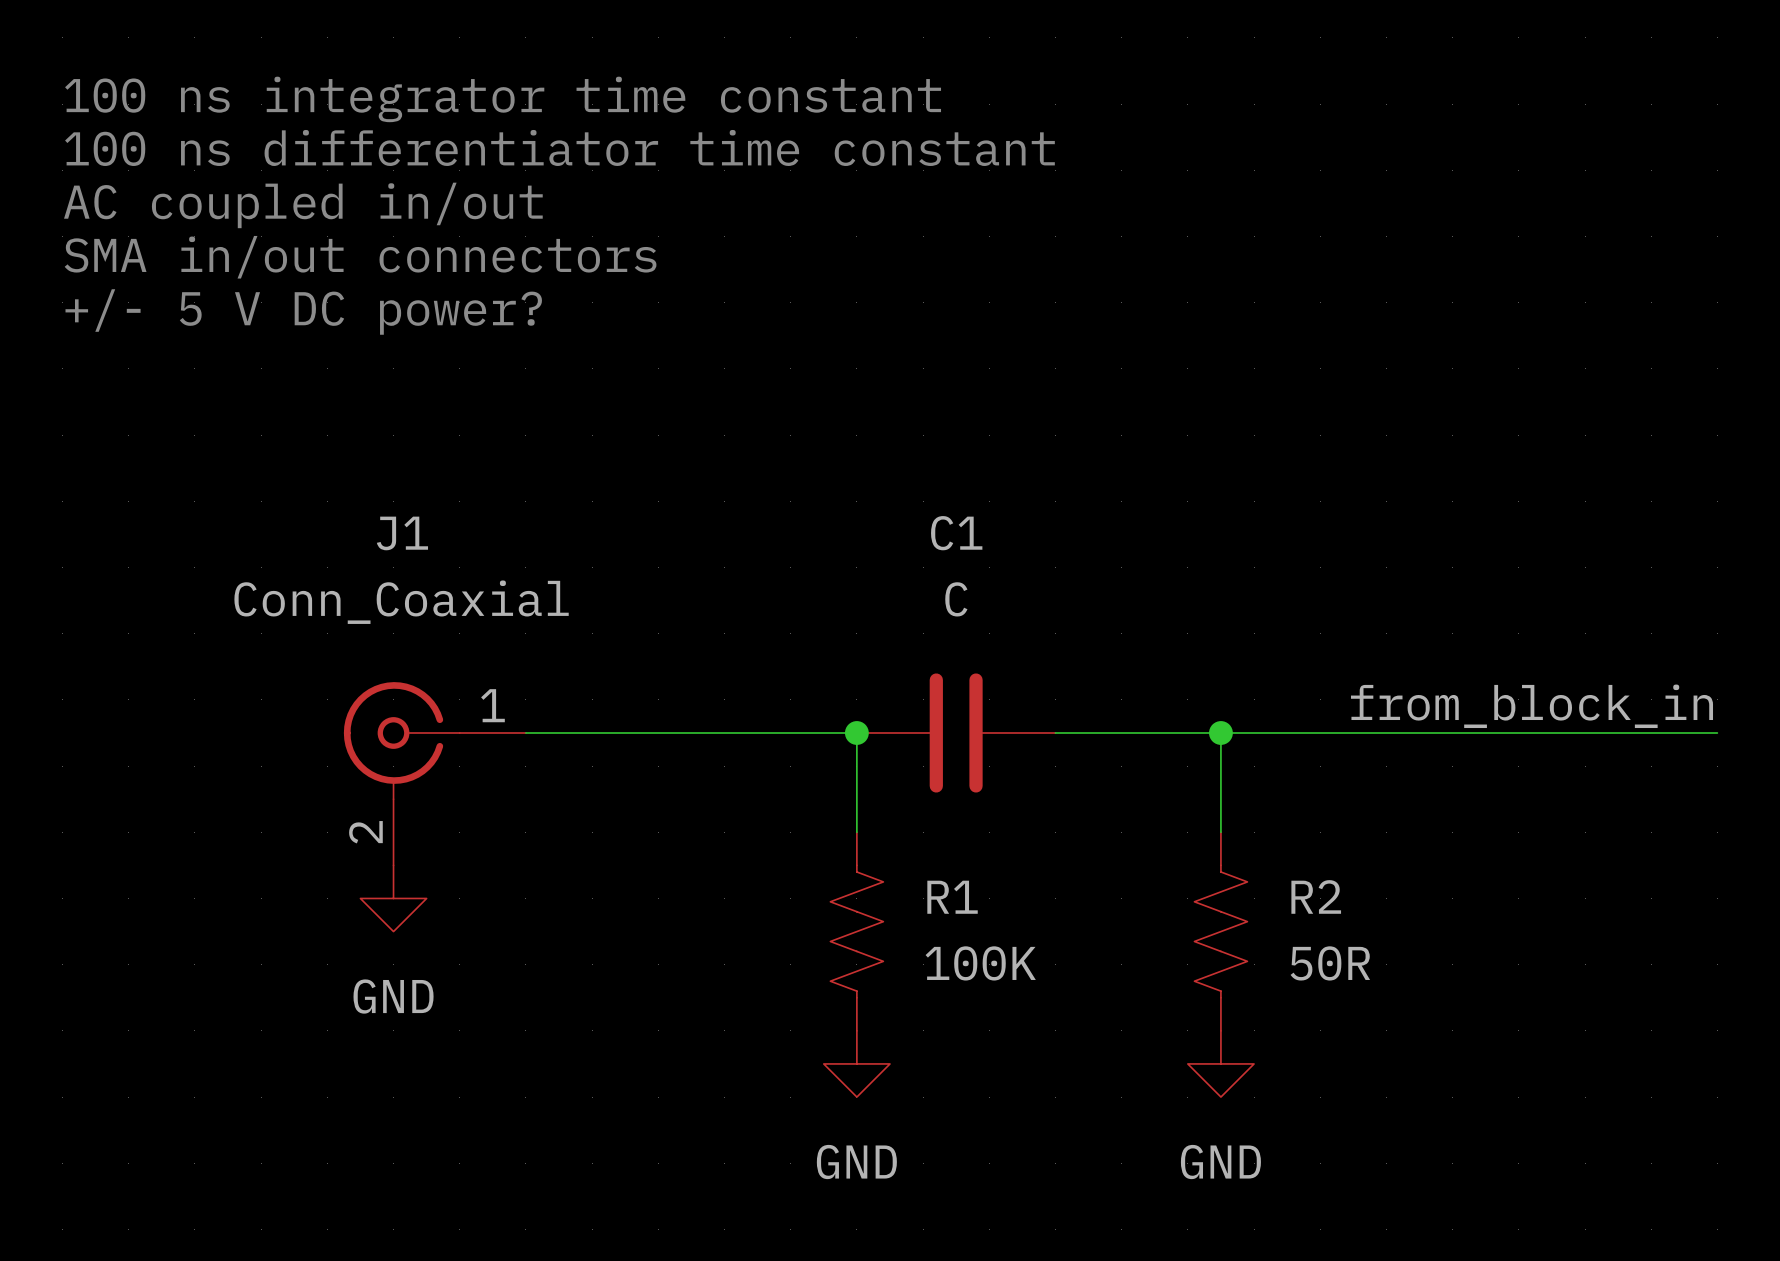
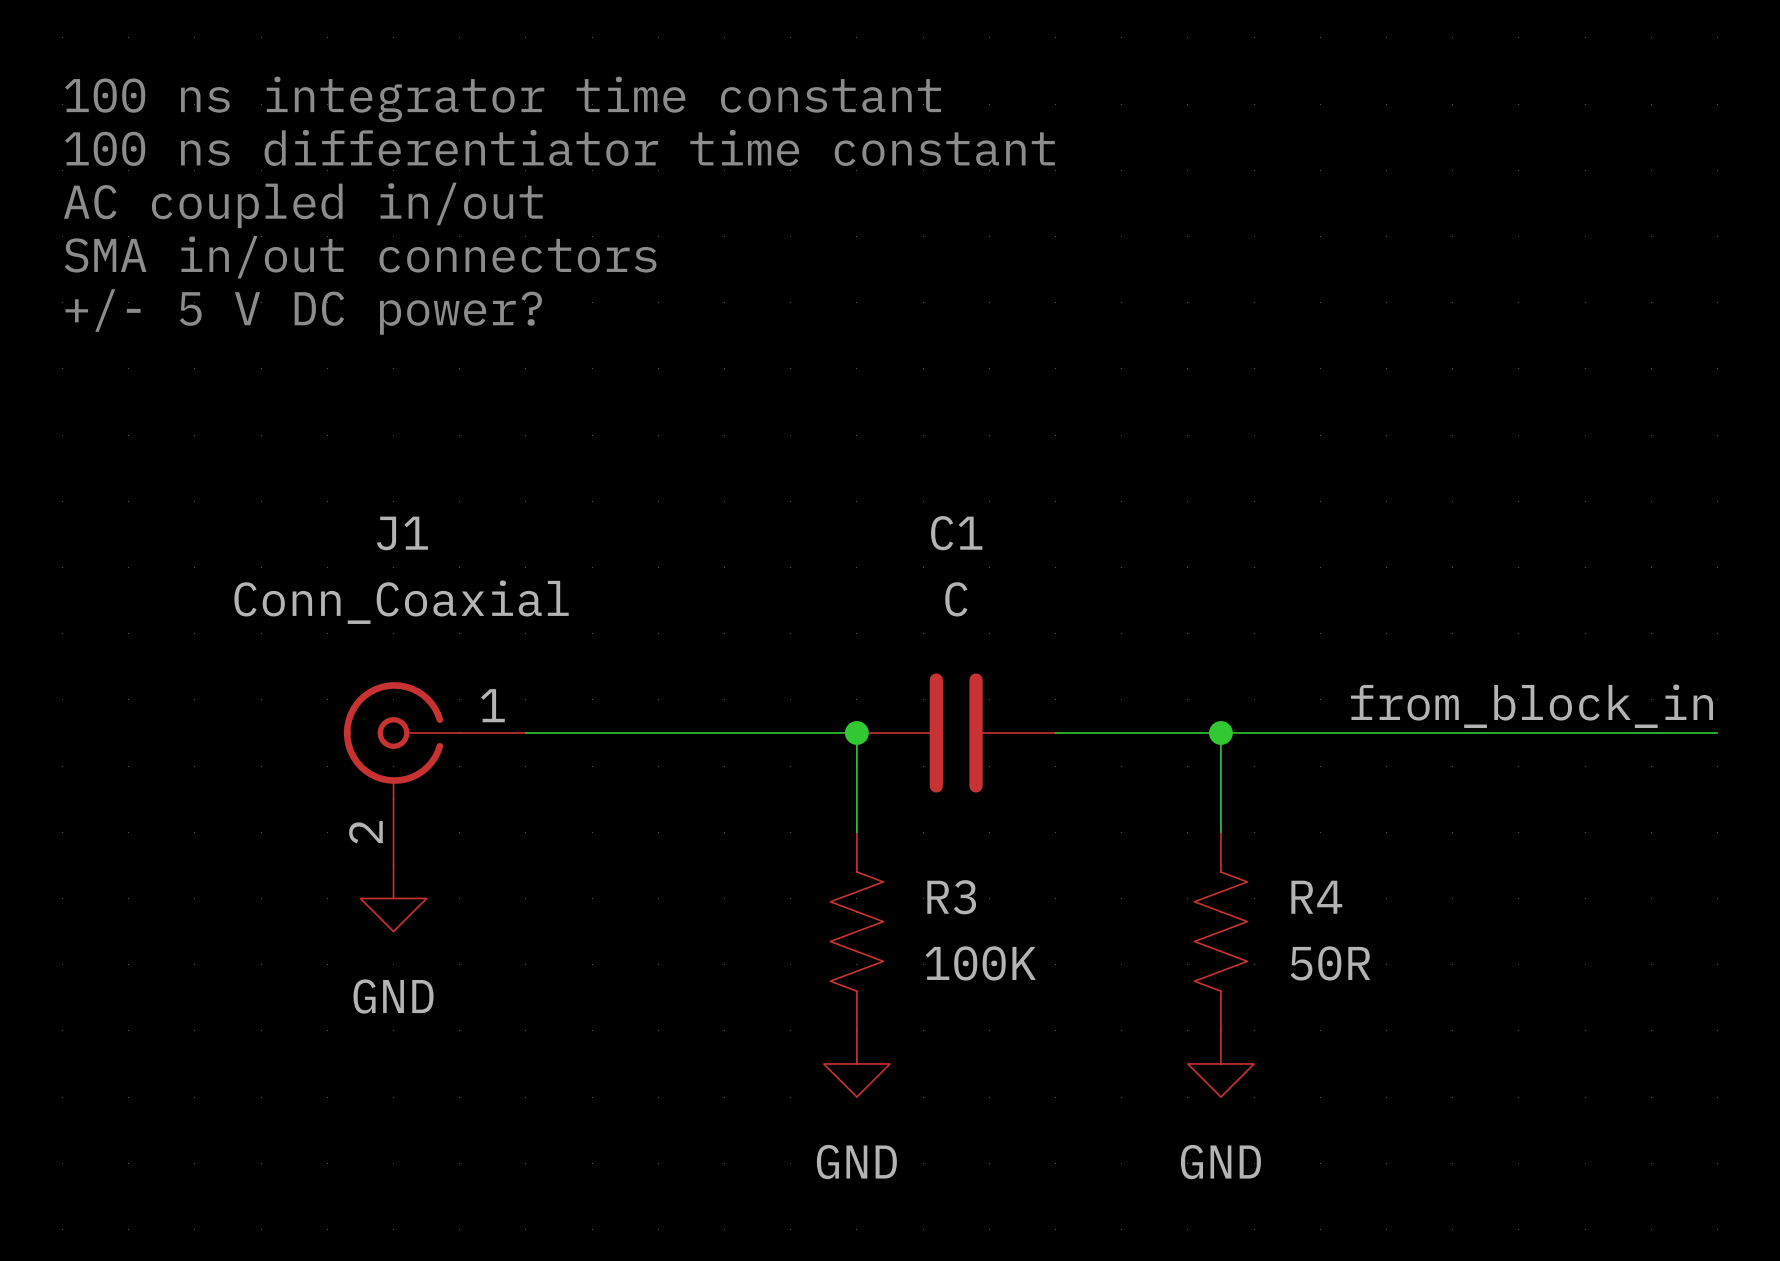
R2 name: R2 (1316, 896) -> R4 (1316, 897)
R1 name: R1 (952, 897) -> R3 (951, 897)

